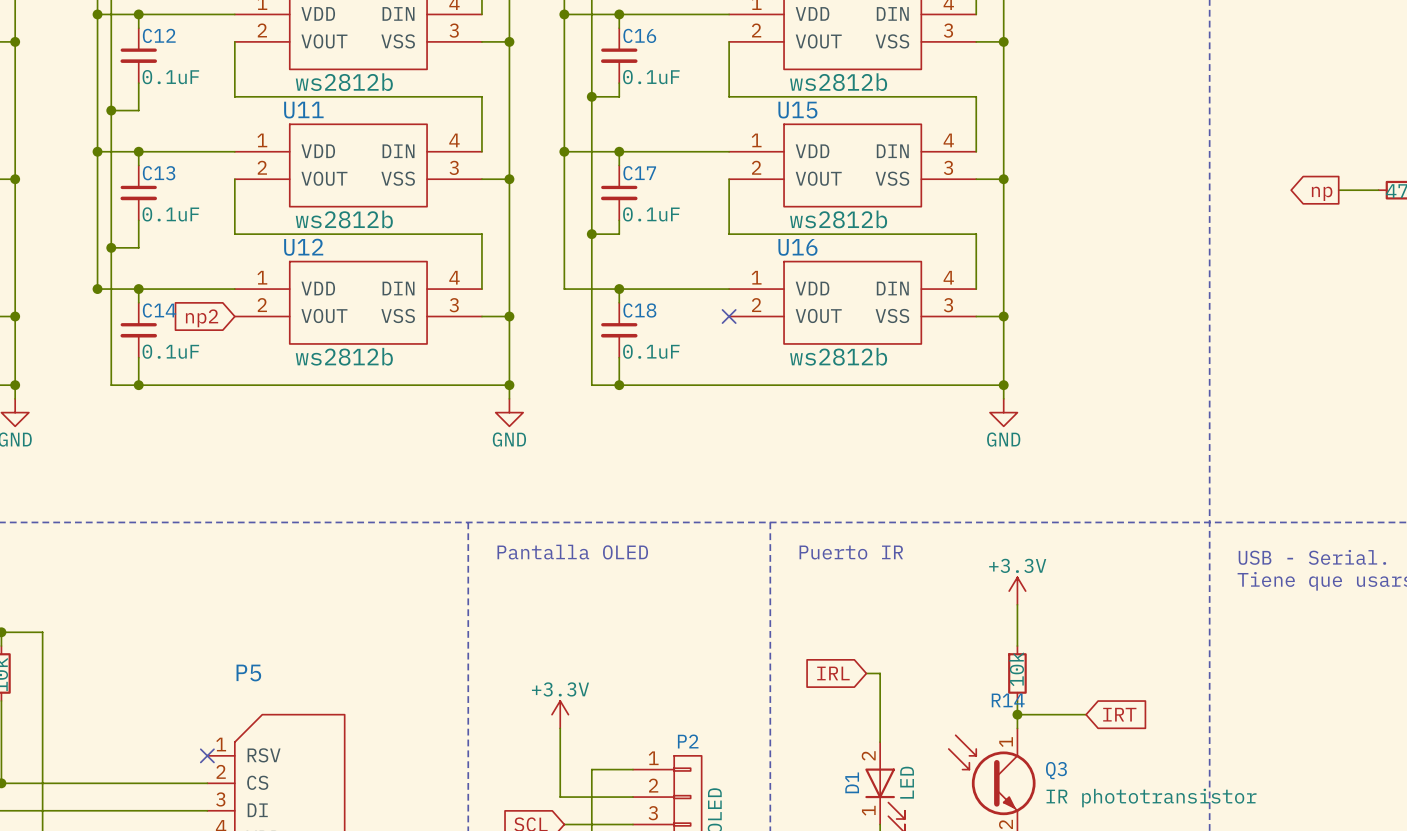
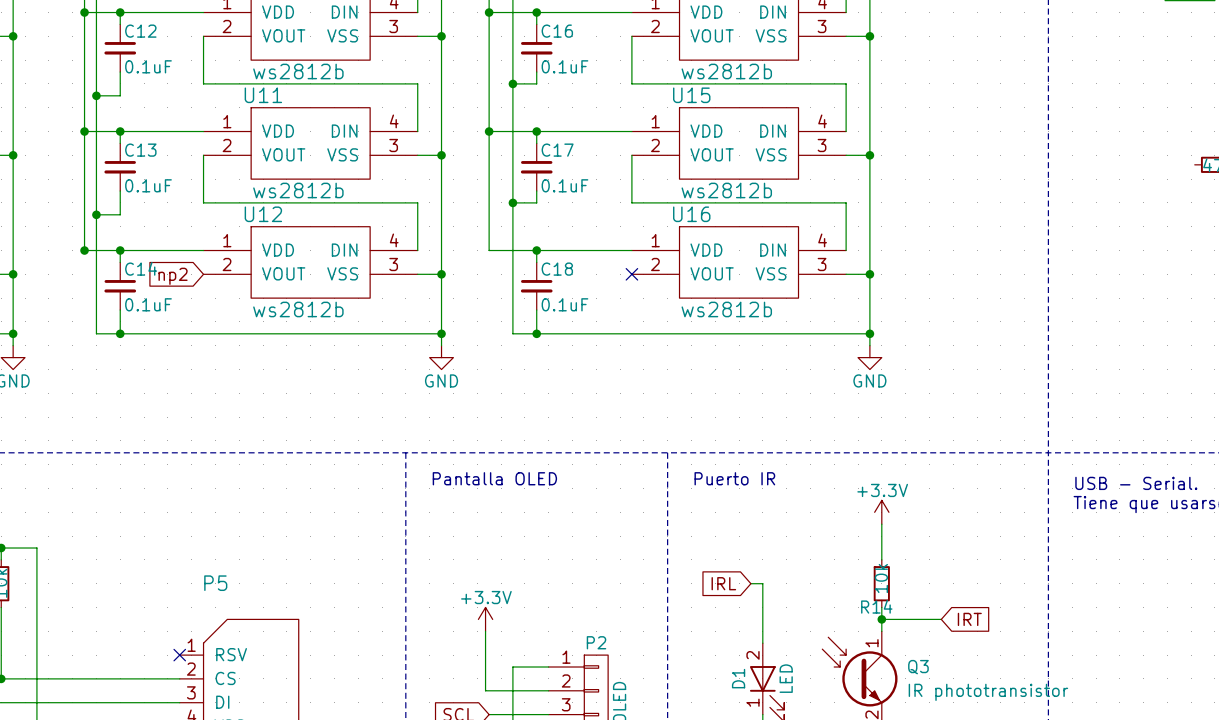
wire: none -> (1165, 0) (1214, 0)
wire: (1338, 190) (1378, 190) -> none
global label: np (1322, 193) -> none

